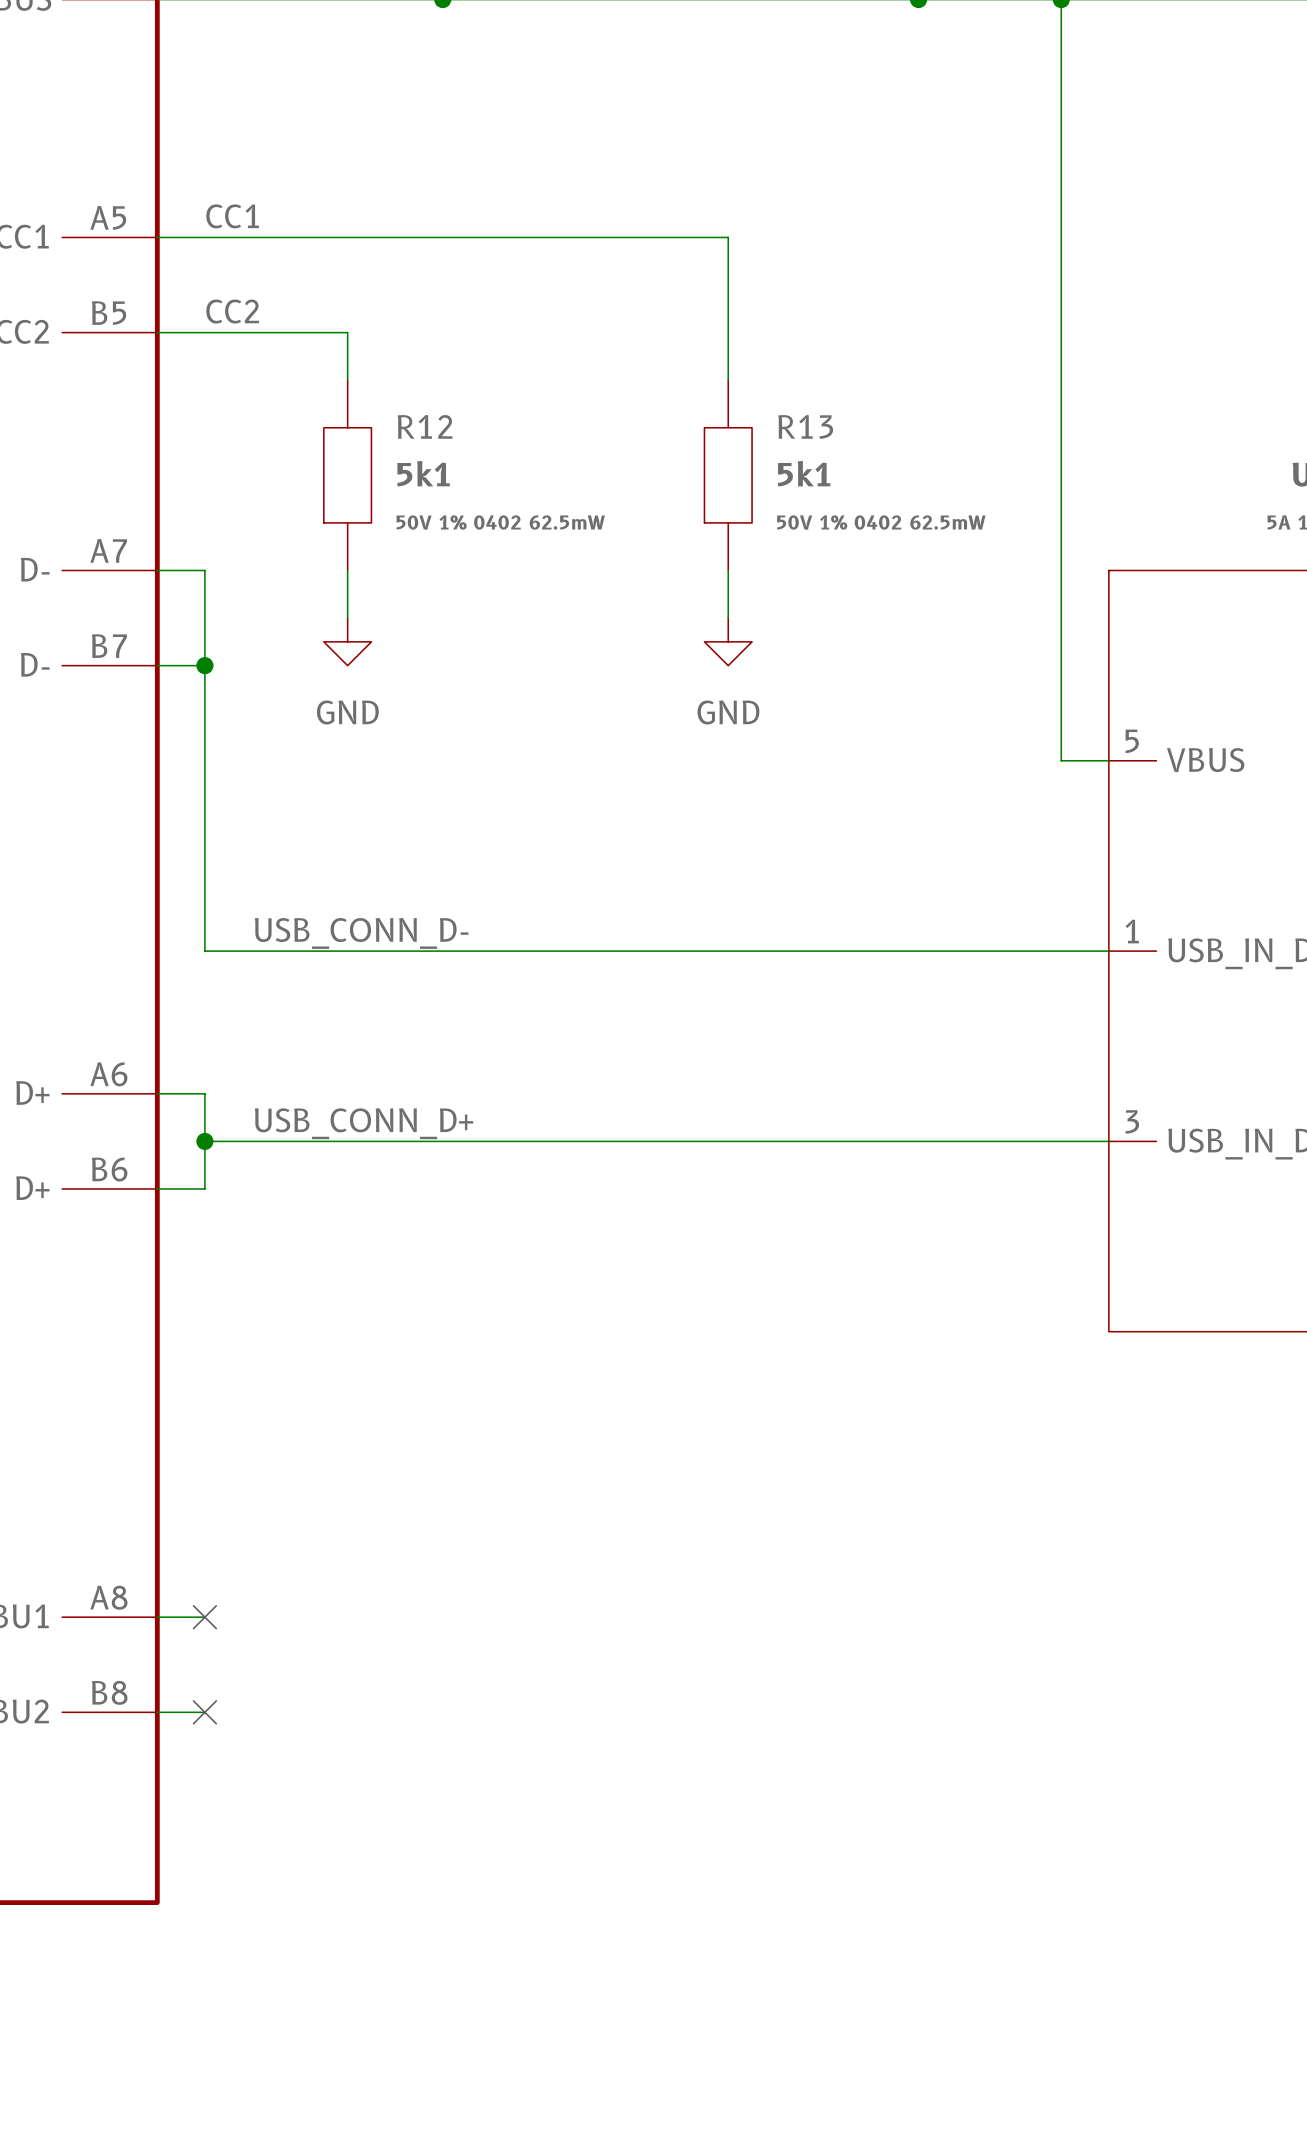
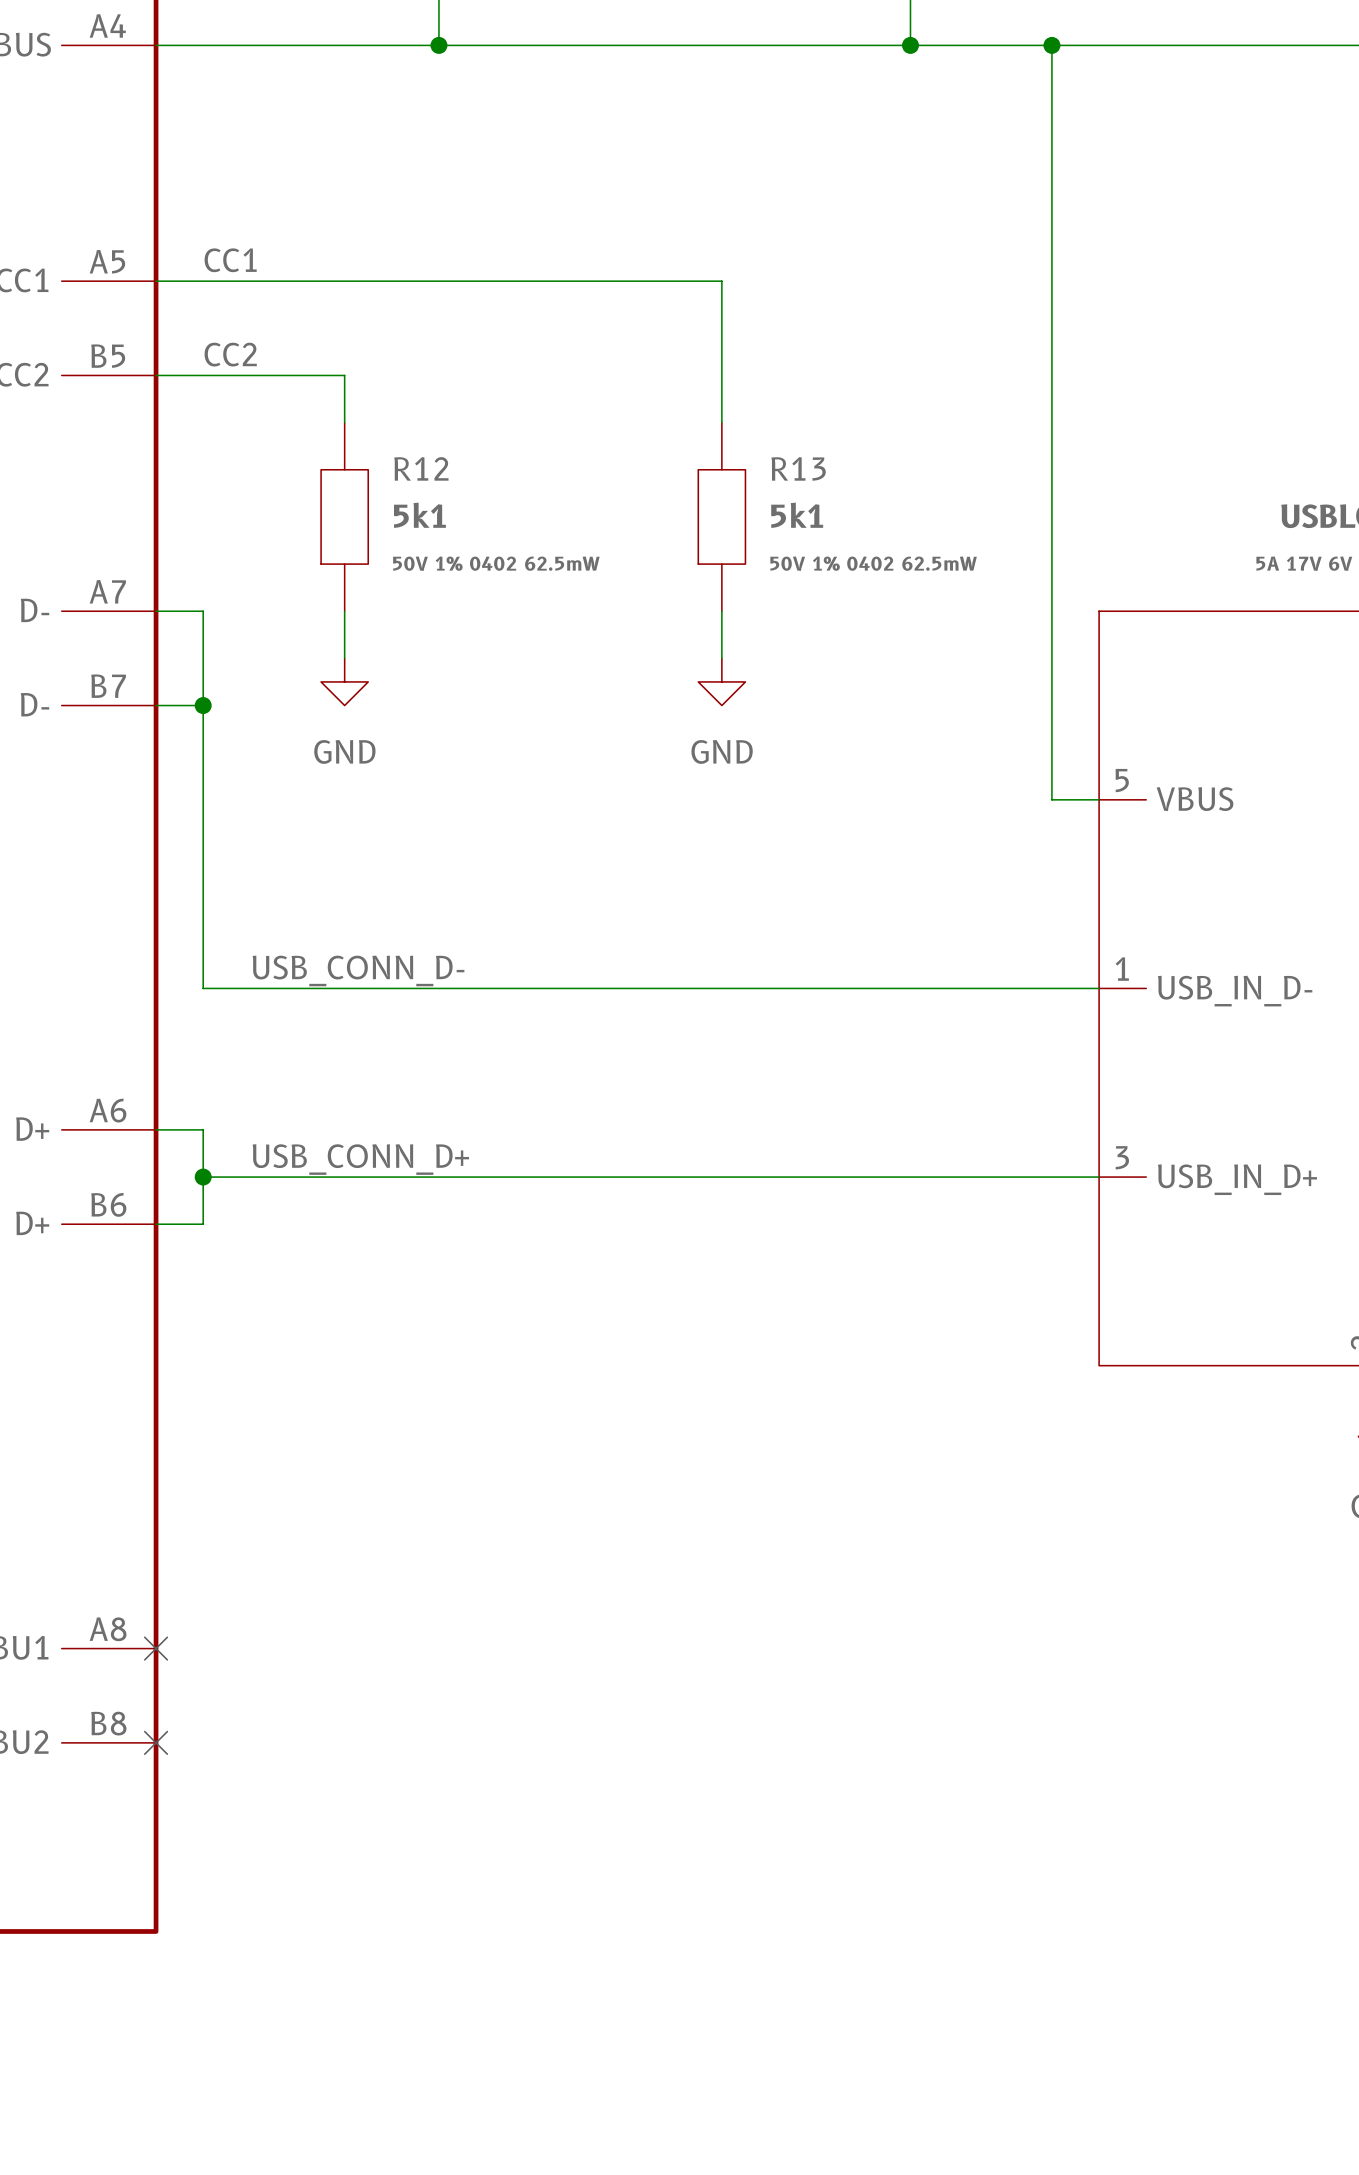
wire: (157, 1617) (204, 1617) -> none
no-connect mark position: (204, 1617) -> (156, 1648)
wire: (157, 1712) (204, 1712) -> none
no-connect mark position: (204, 1712) -> (156, 1742)

